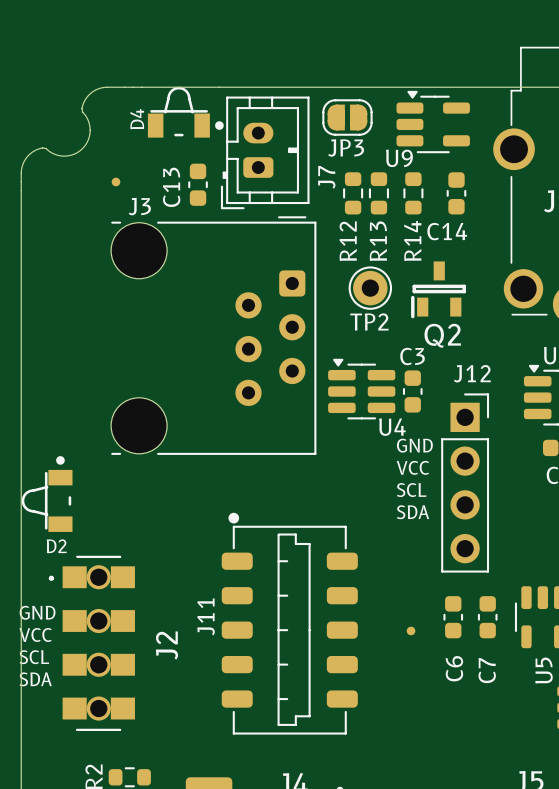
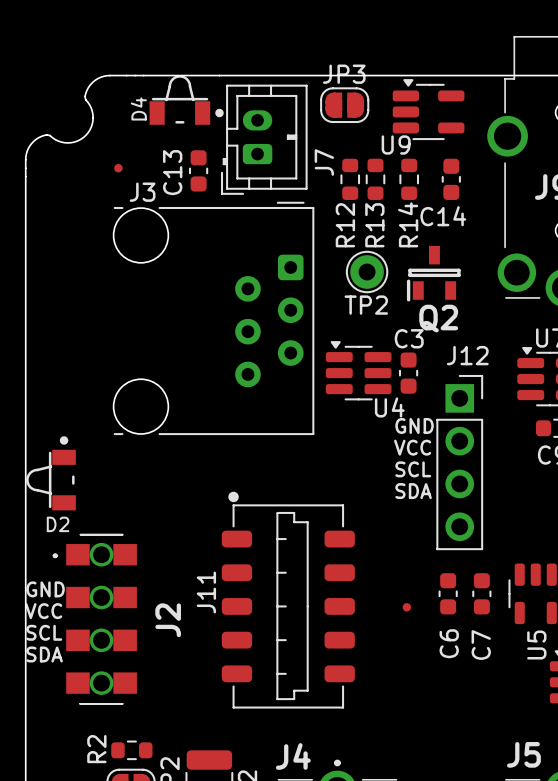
JP3 name position: JP3 (346, 147) -> JP3 (344, 74)

